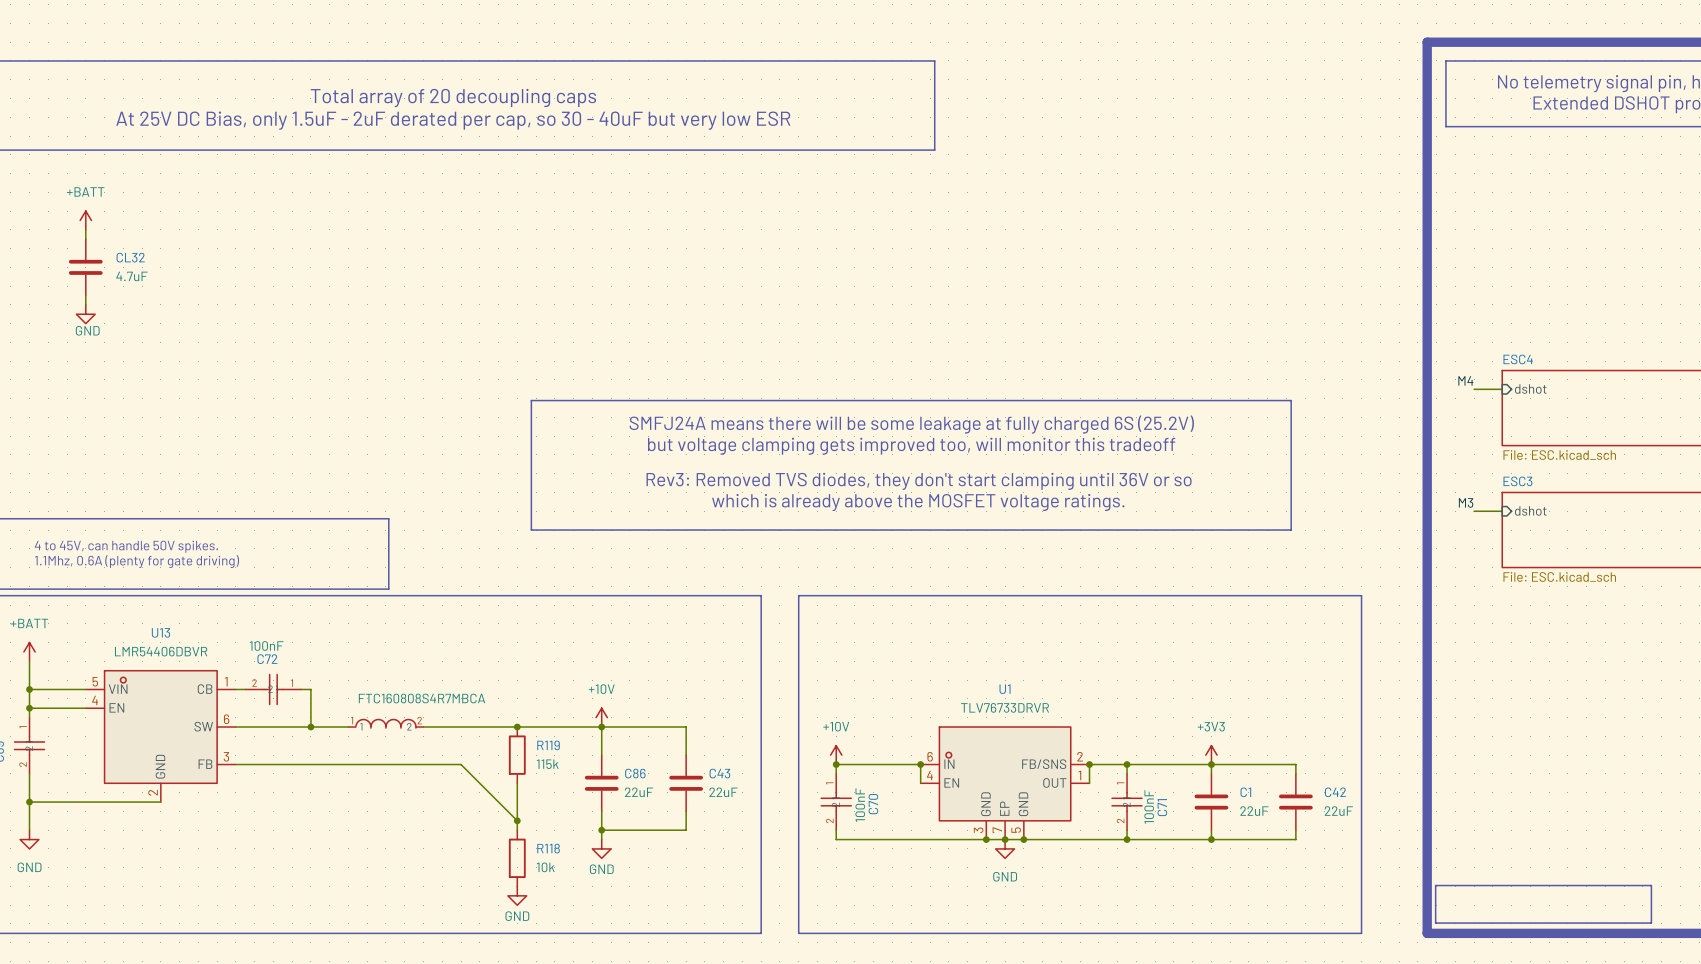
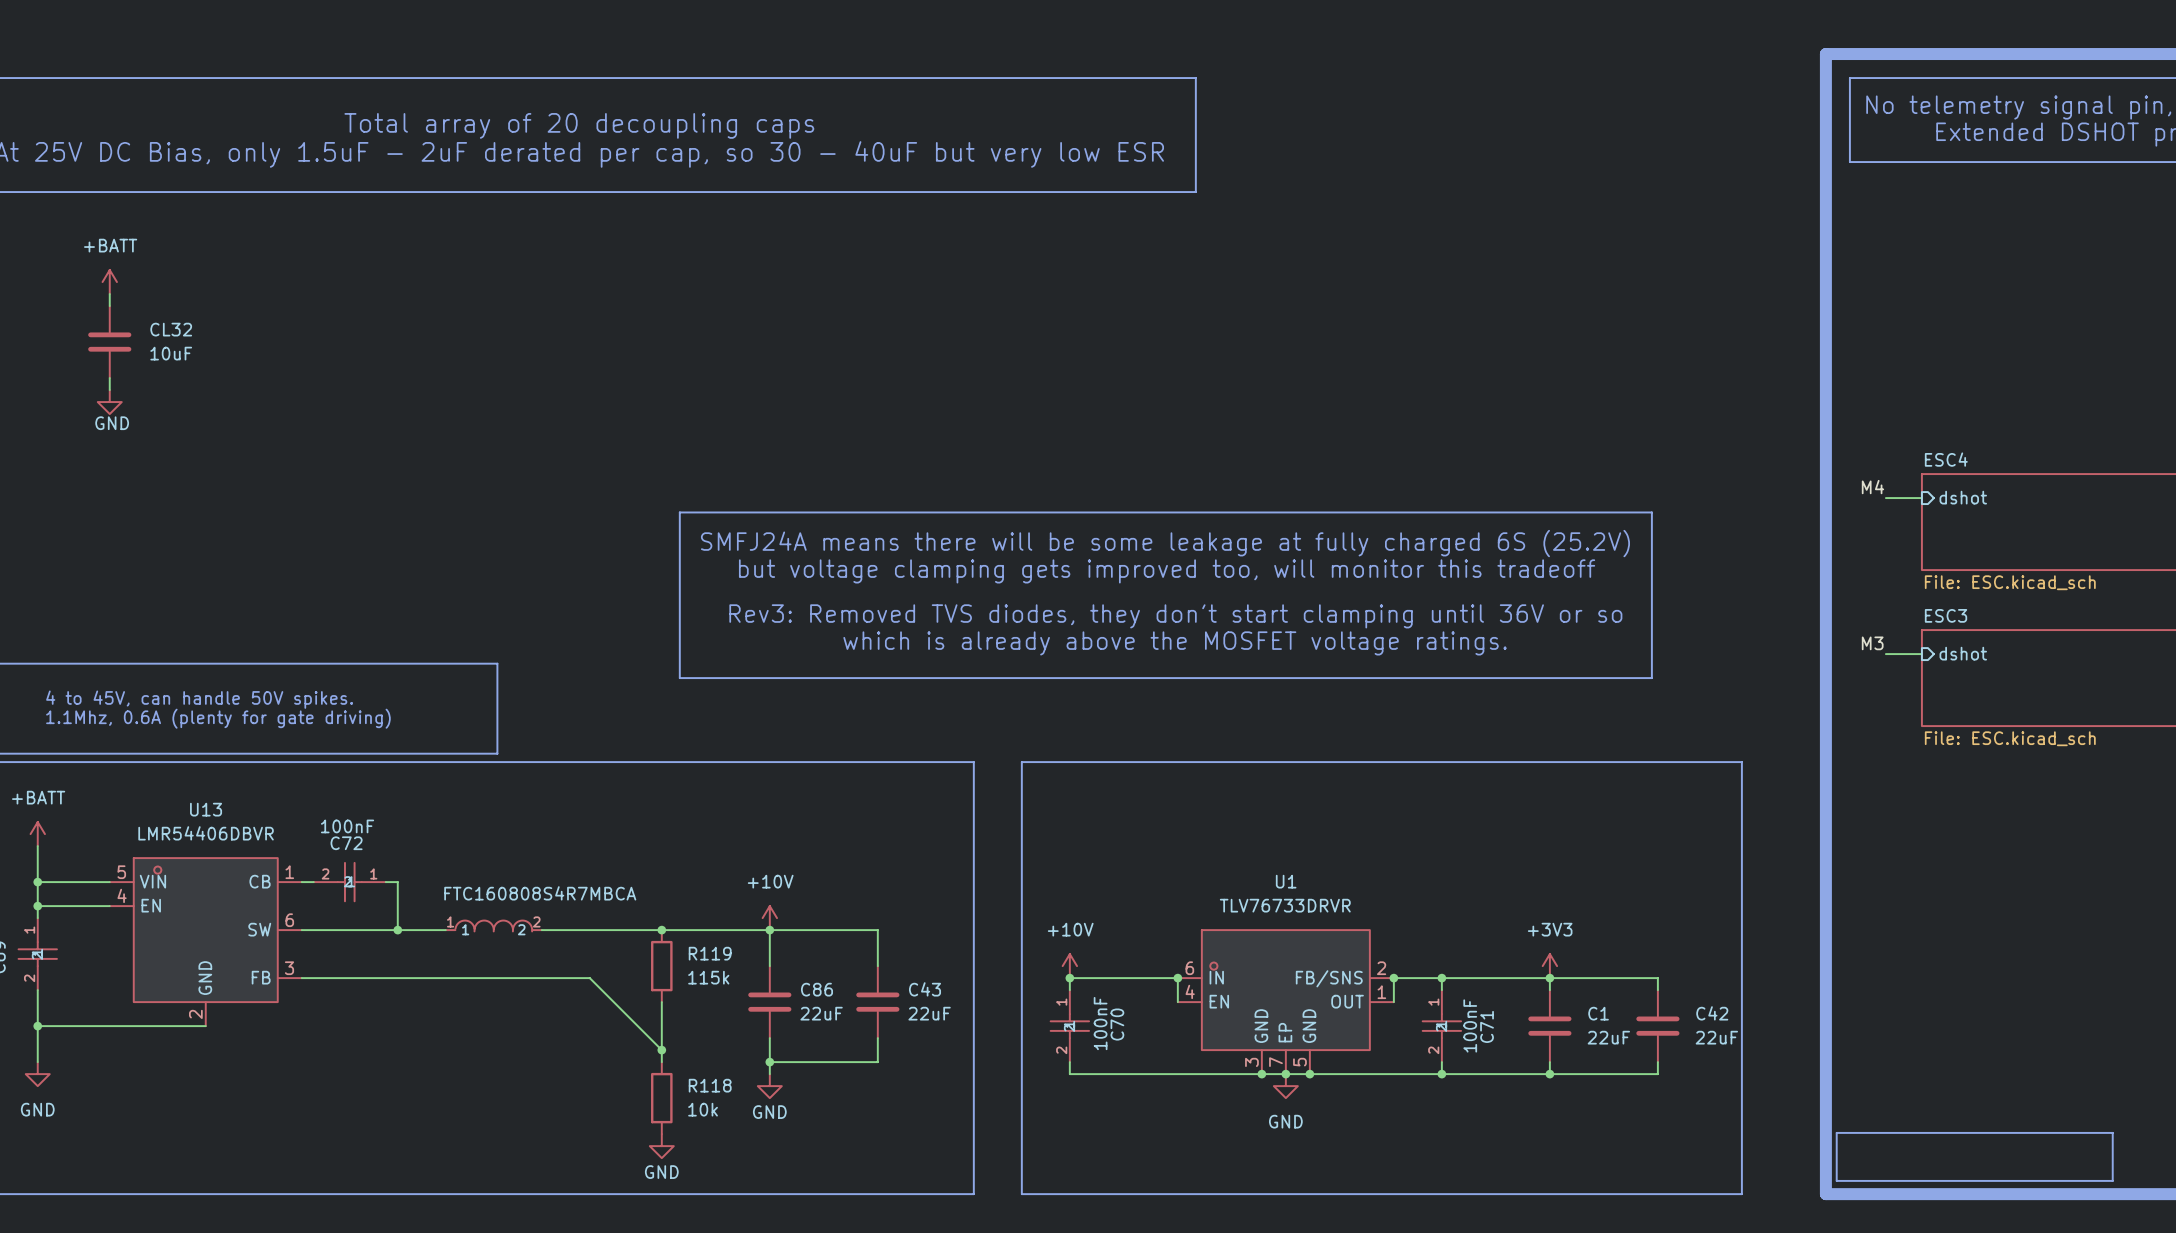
CL32 value: 4.7uF (131, 276) -> 10uF (171, 353)

